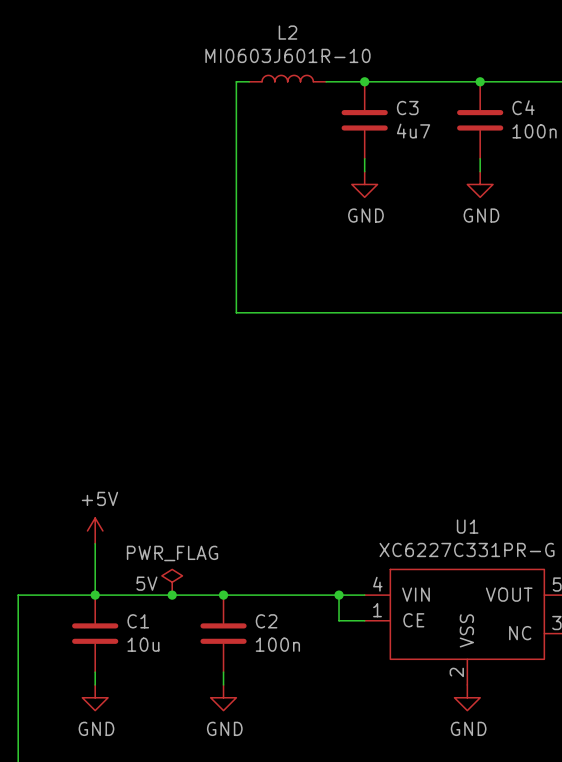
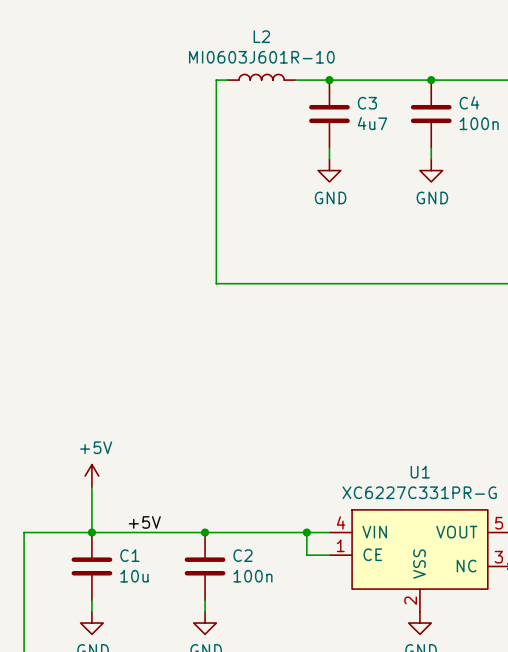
power symbol: PWR_FLAG (172, 582) -> none
label: 5V (146, 583) -> +5V (144, 522)
junction: (172, 595) -> none

